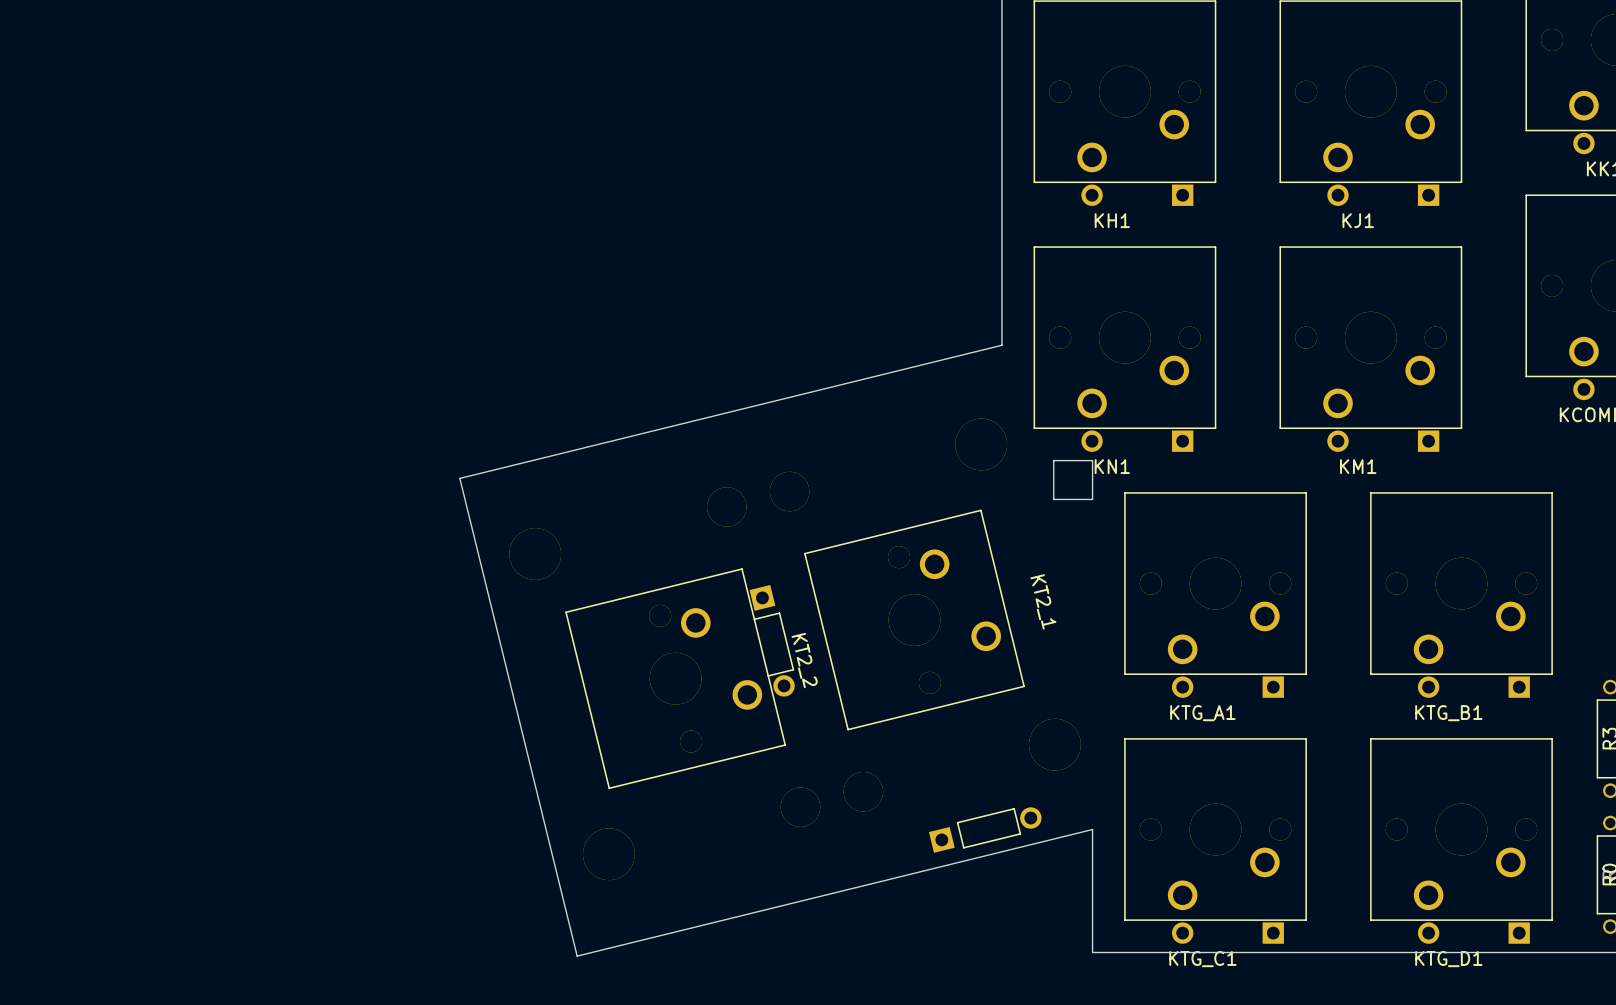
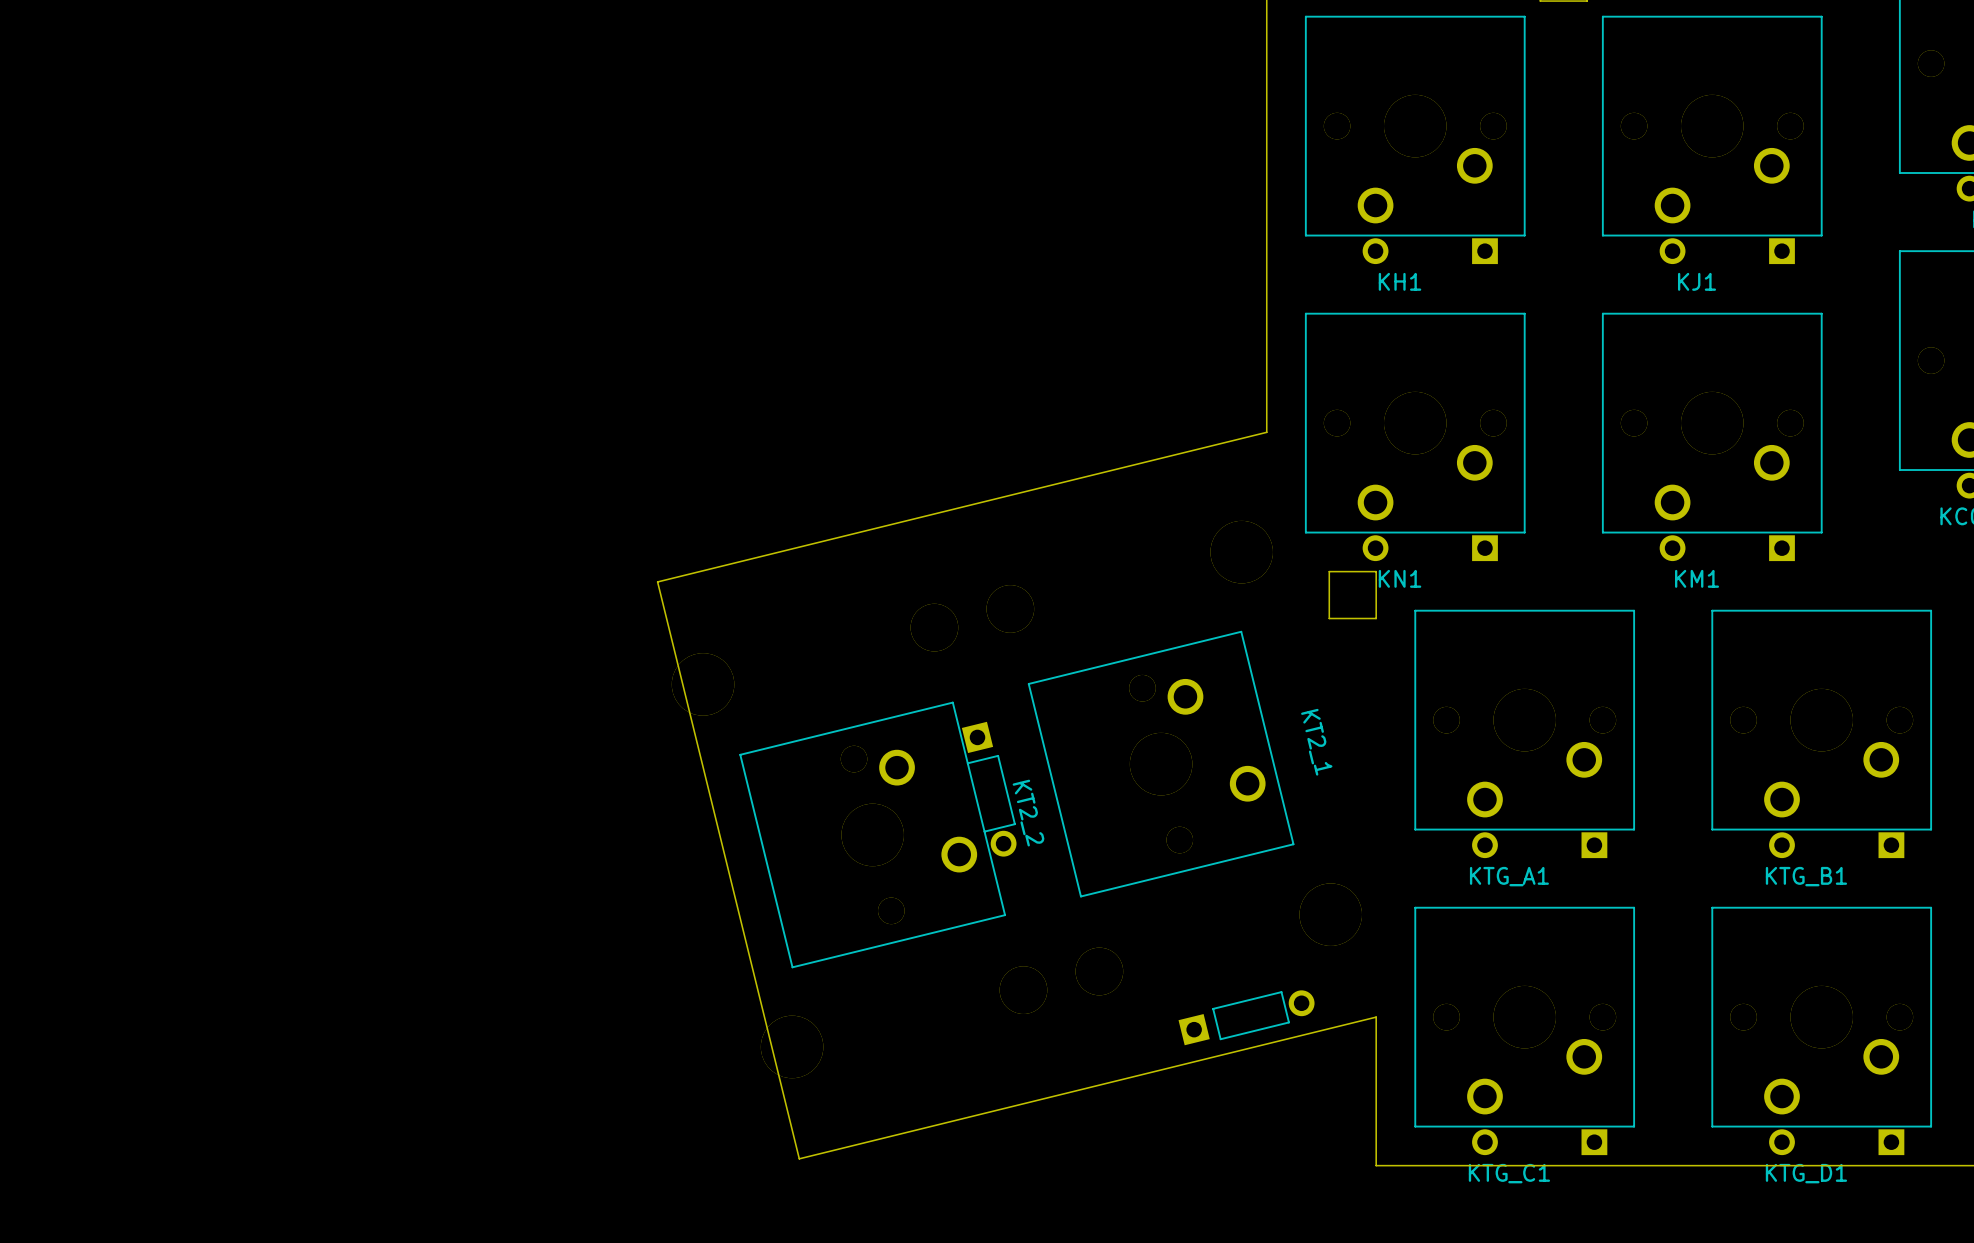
board edge: (497, 469) (459, 478) (577, 956) (614, 946) -> (657, 581) (799, 1158)

